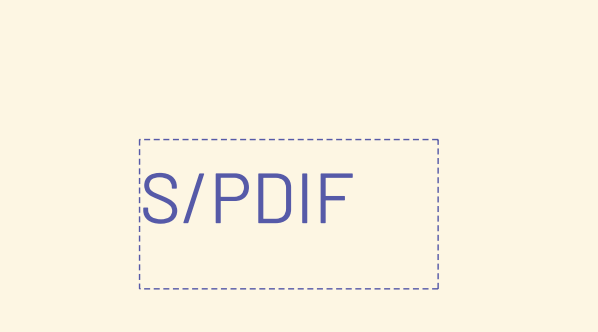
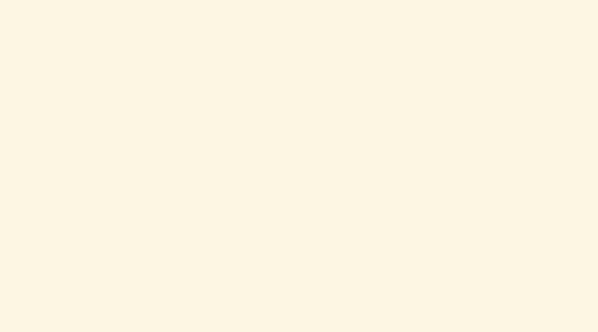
line: (139, 139) (139, 288) (438, 288) (438, 139) (139, 139) -> none
text: S/PDIF (247, 198) -> none

